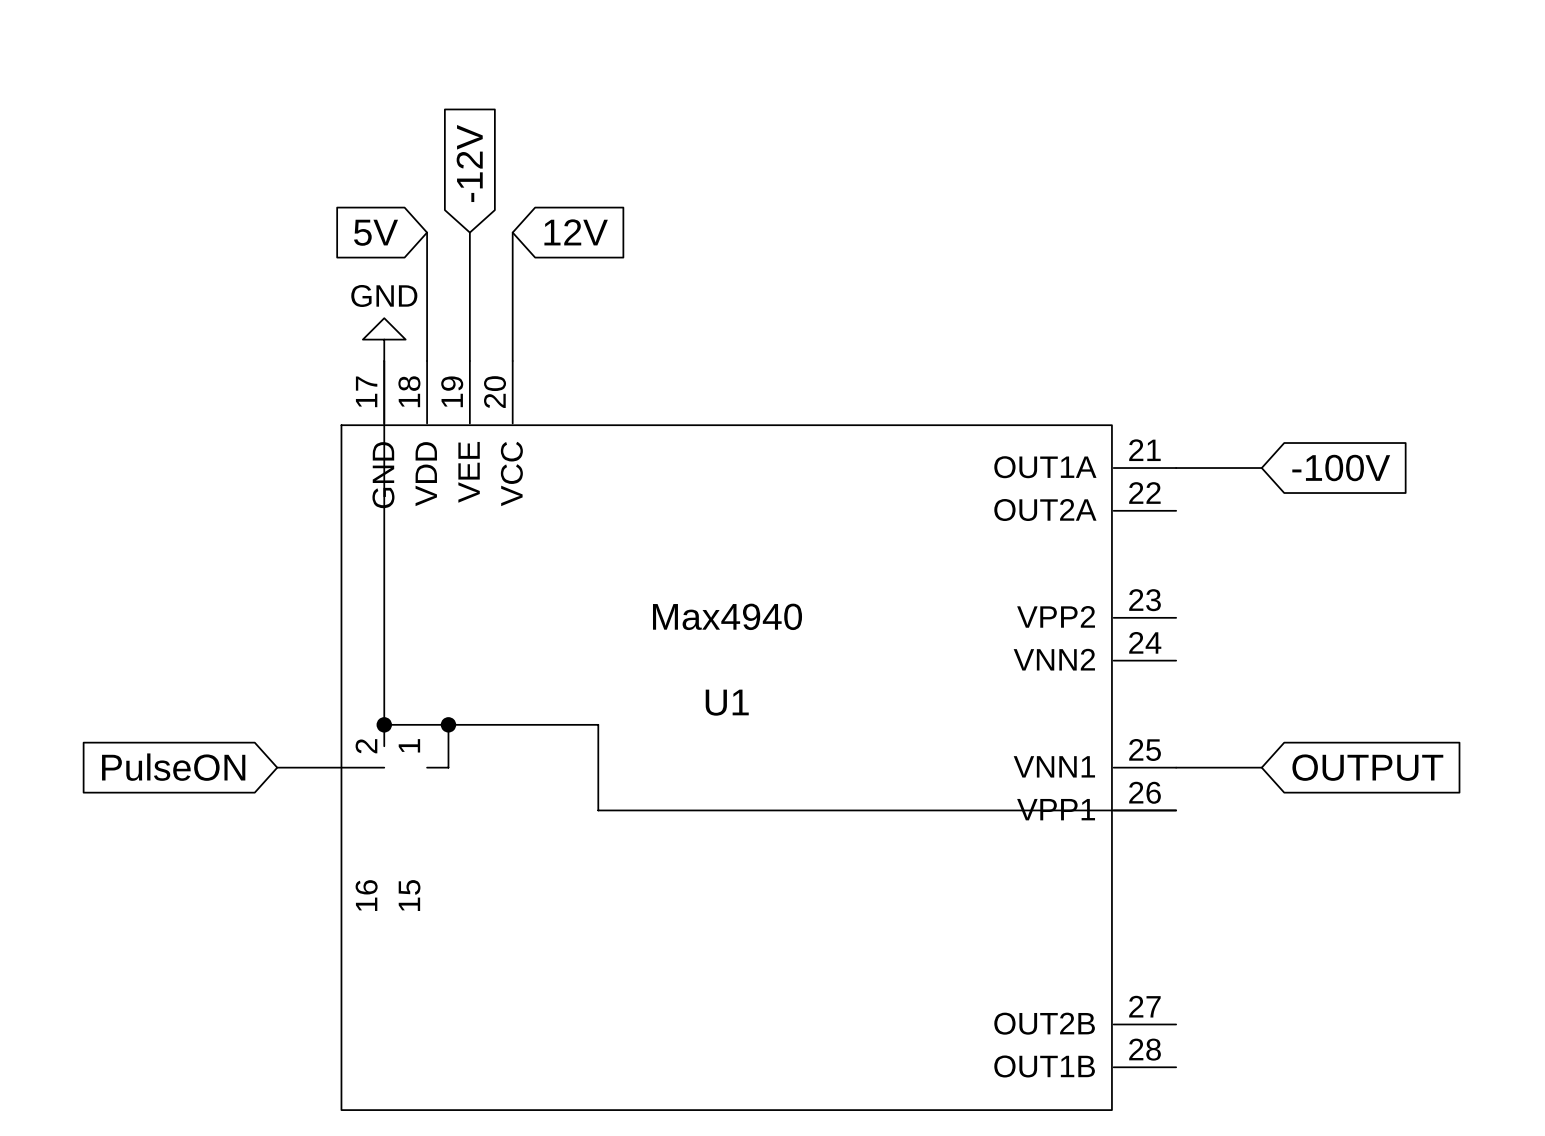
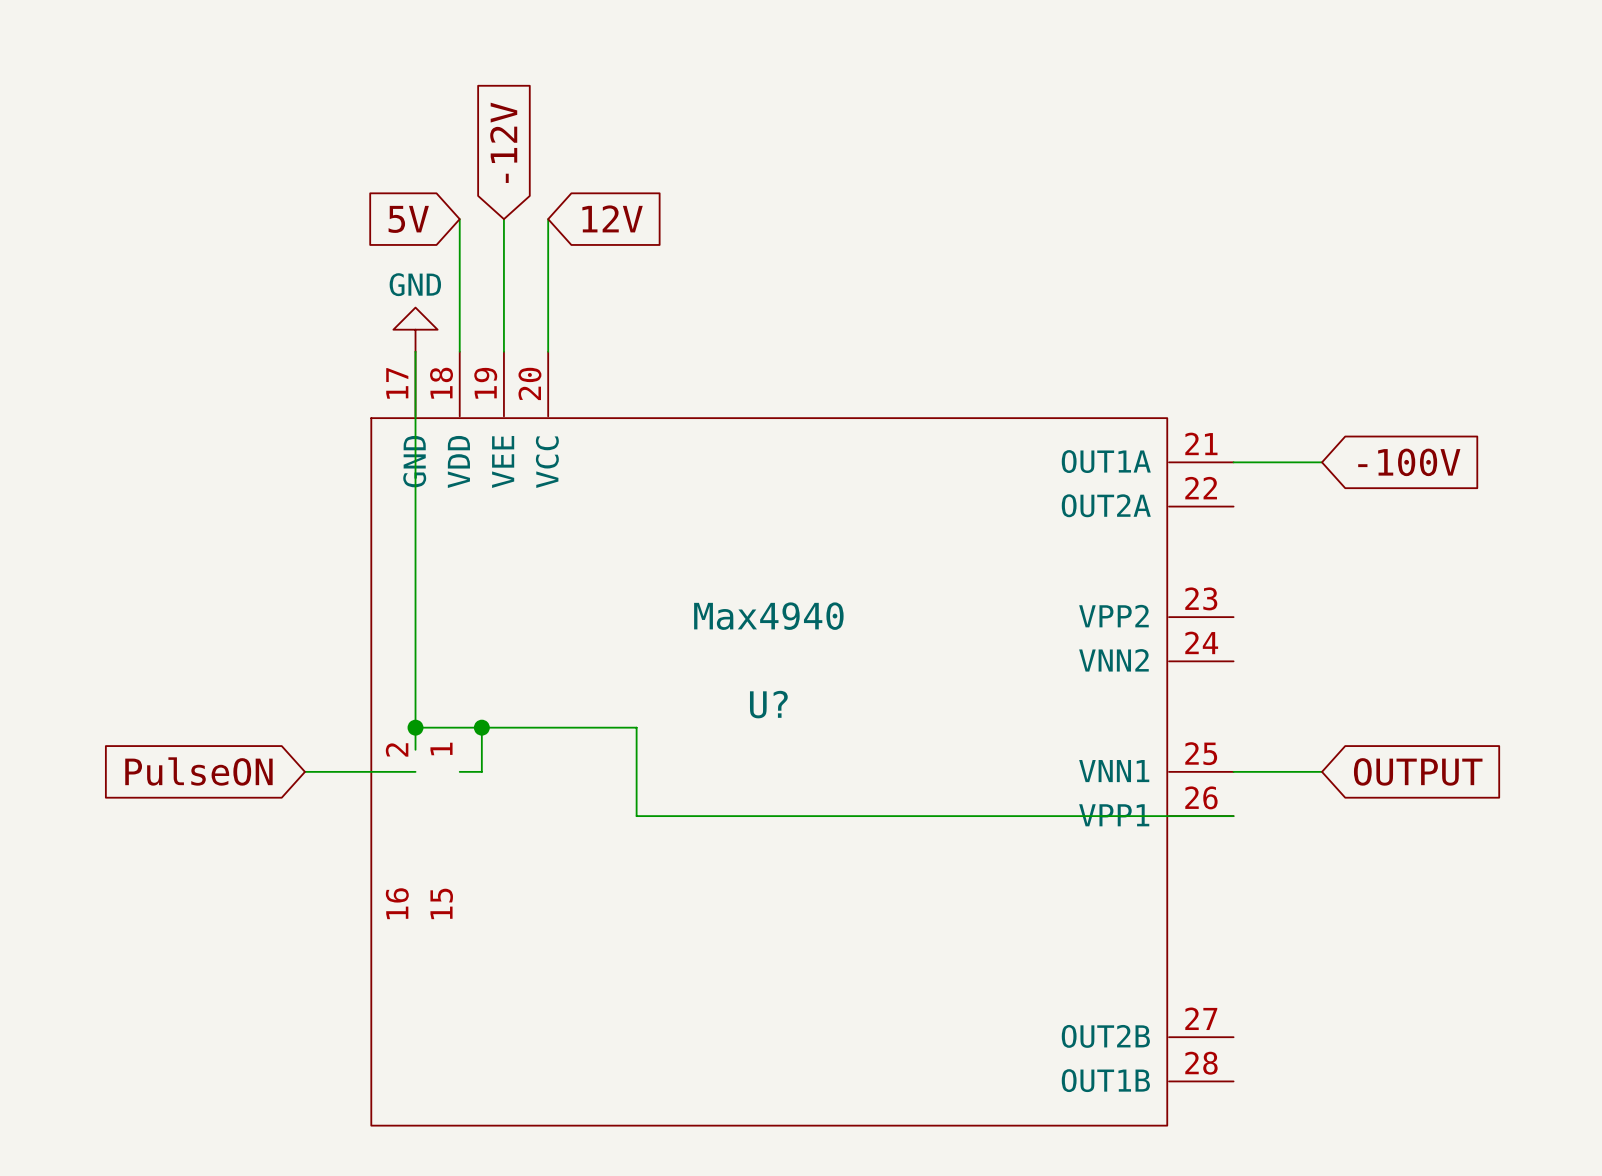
U1 name: U1 (727, 702) -> U? (768, 704)

